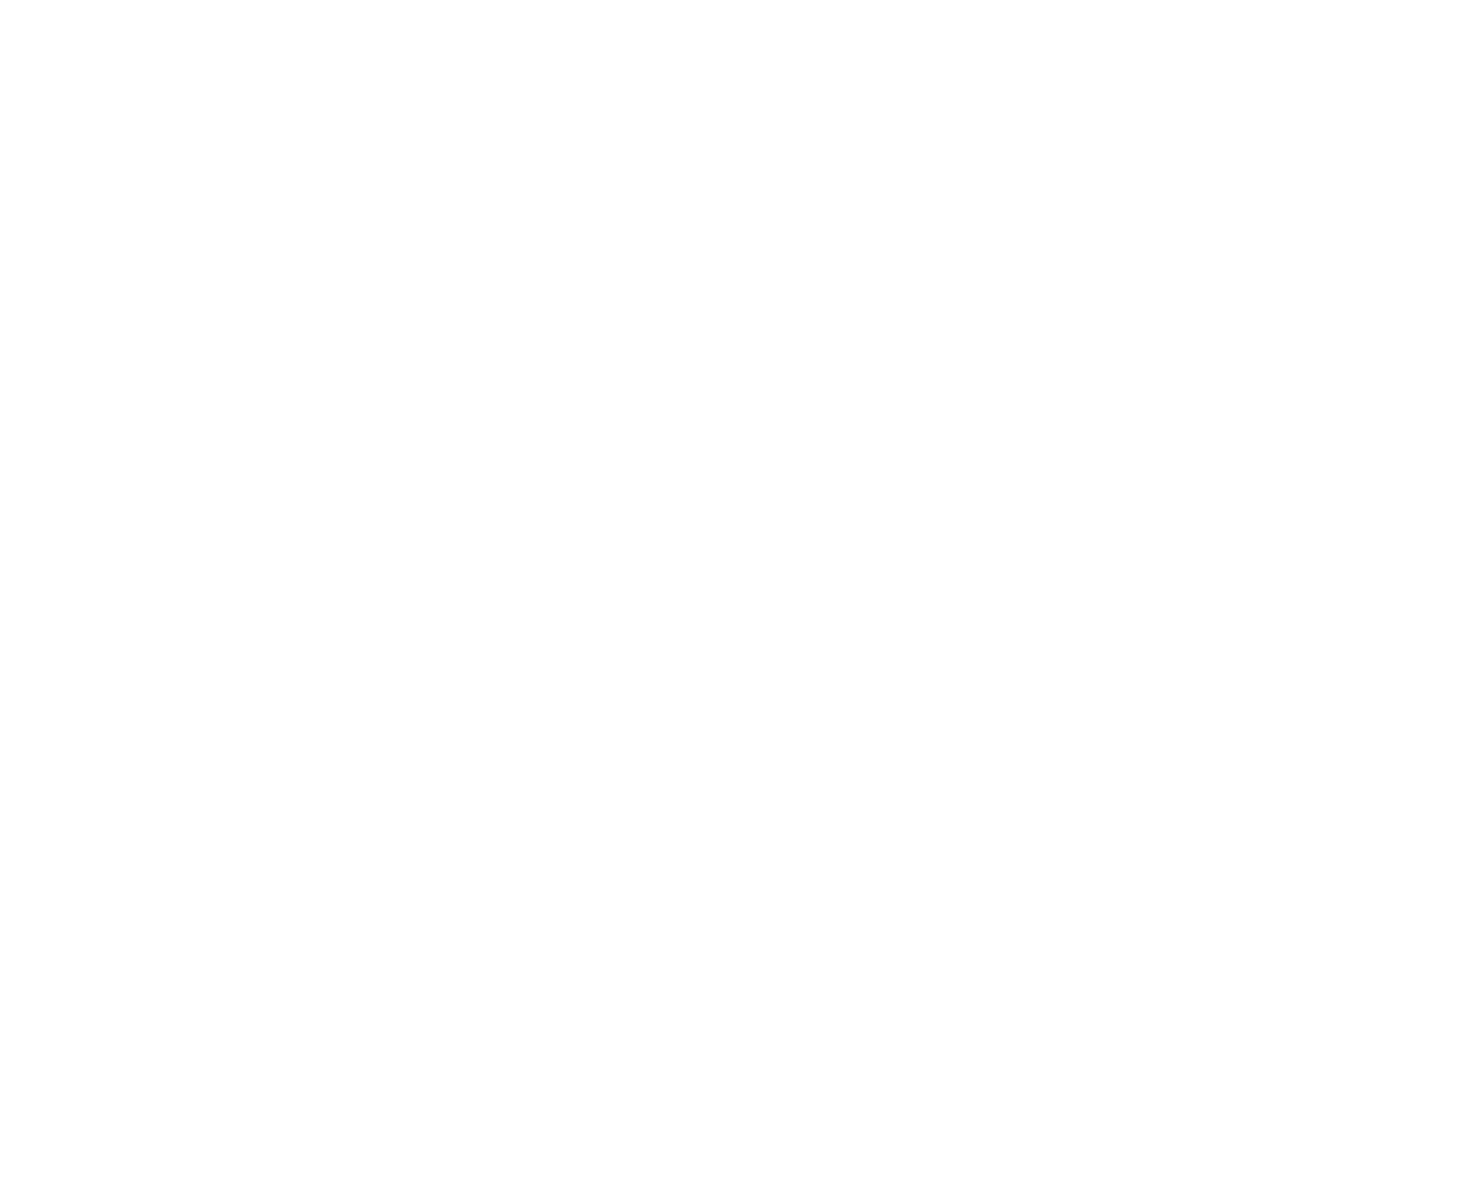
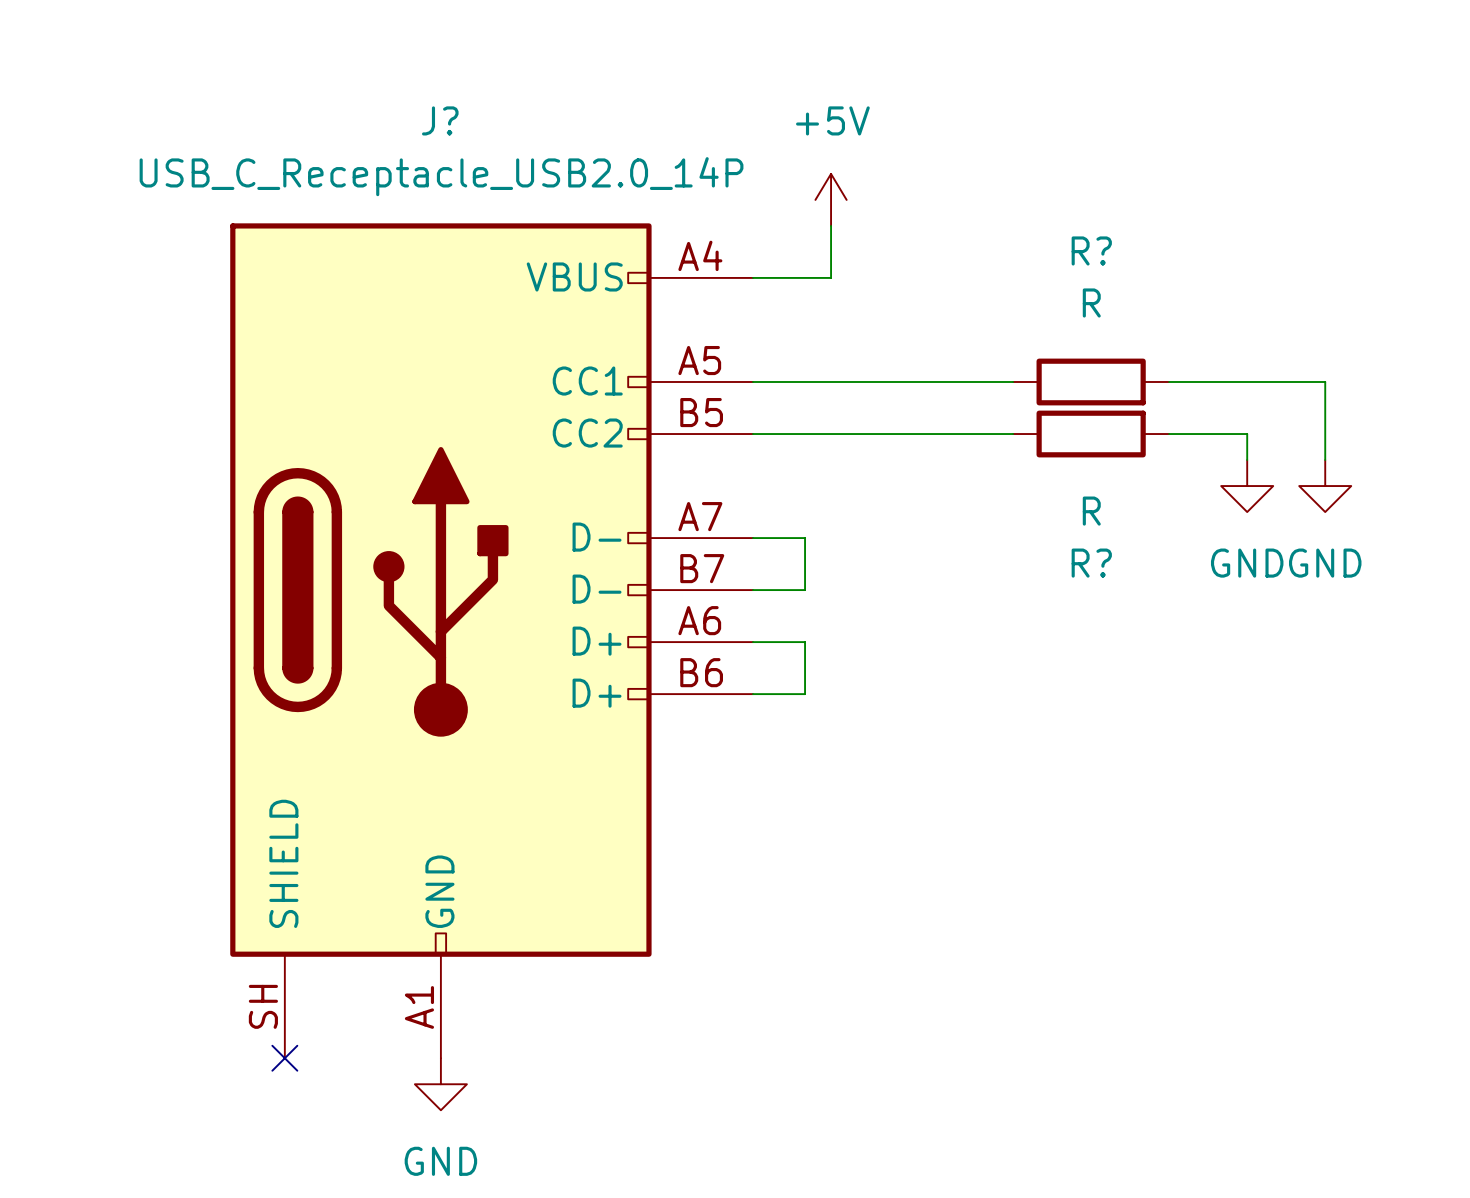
power symbol: none -> +5V (831, 199)
wire: none -> (831, 225) (831, 277) (753, 277)
wire: none -> (753, 381) (1013, 381)
R?: none -> R (1091, 381)
wire: none -> (1169, 381) (1325, 381) (1325, 460)
wire: none -> (753, 434) (1013, 434)
R?: none -> R (1091, 434)
wire: none -> (1169, 434) (1247, 434) (1247, 460)
power symbol: none -> GND (1247, 486)
power symbol: none -> GND (1325, 486)
wire: none -> (753, 538) (805, 538) (805, 590) (753, 590)
J?: none -> USB_C_Receptacle_USB2.0_14P (491, 640)
wire: none -> (753, 642) (805, 642) (805, 694) (753, 694)
no-connect mark: none -> (284, 1058)
power symbol: none -> GND (440, 1084)

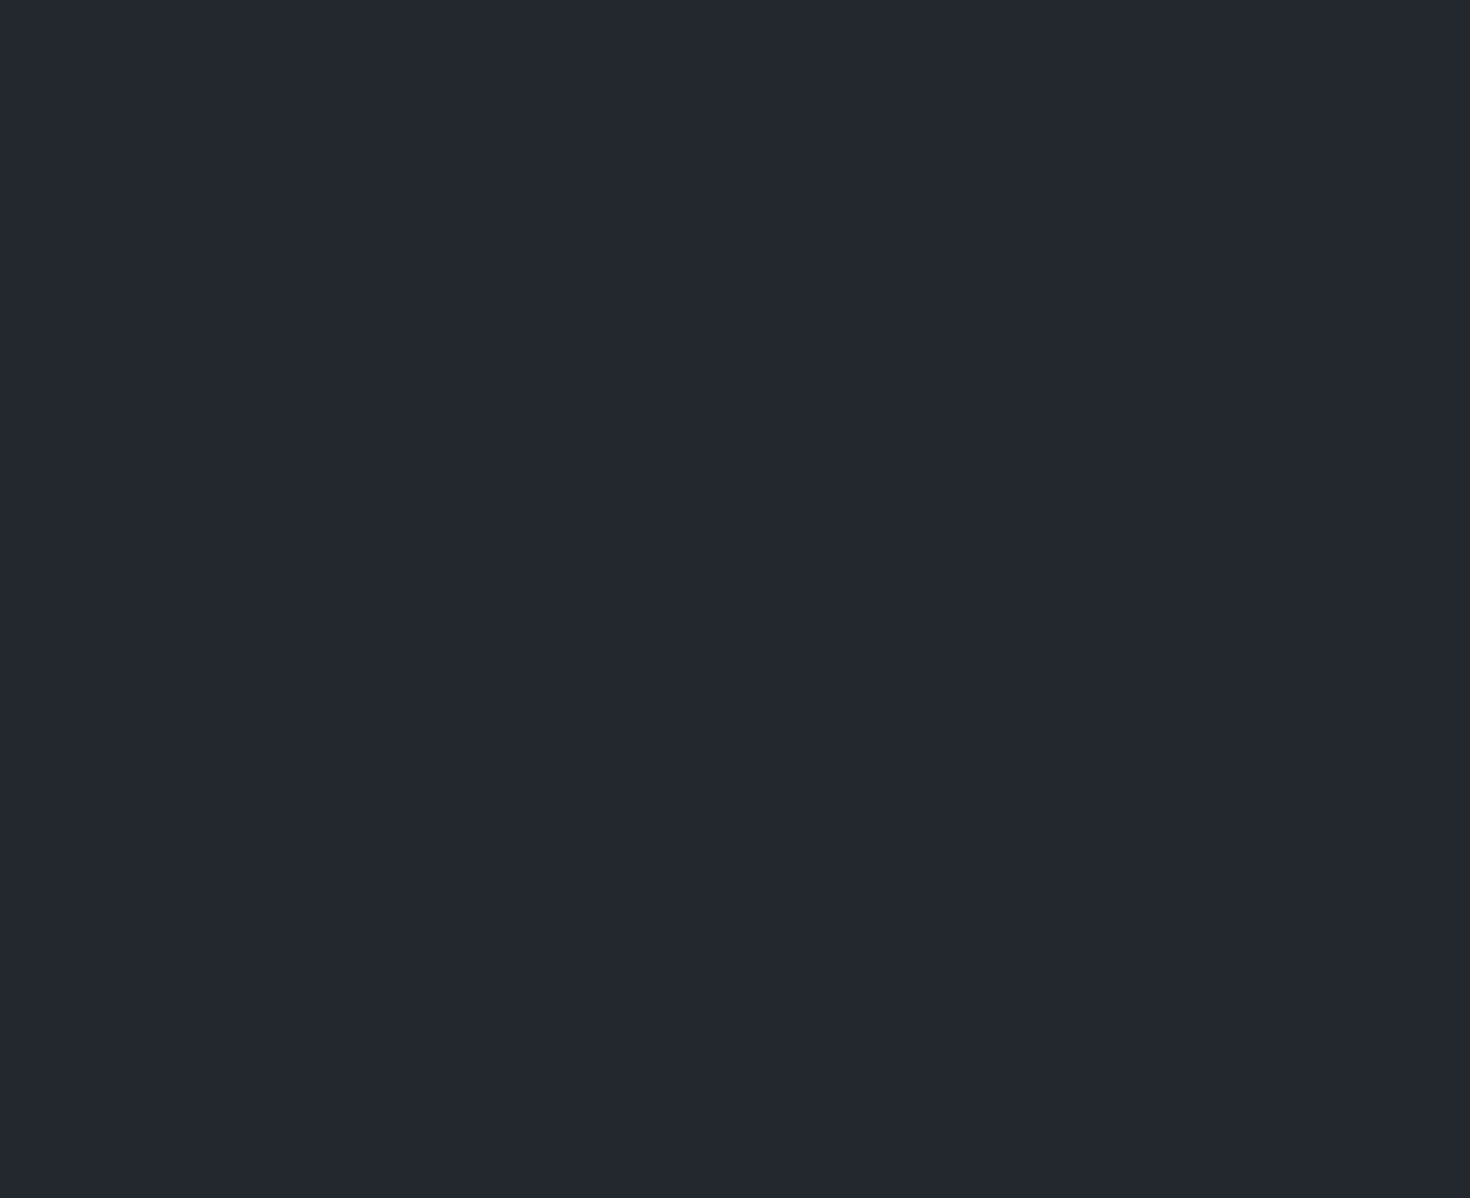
power symbol: +5V (831, 199) -> none
wire: (831, 225) (831, 277) (753, 277) -> none
wire: (753, 381) (1013, 381) -> none
R?: R (1091, 381) -> none
wire: (1169, 381) (1325, 381) (1325, 460) -> none
wire: (753, 434) (1013, 434) -> none
R?: R (1091, 434) -> none
wire: (1169, 434) (1247, 434) (1247, 460) -> none
power symbol: GND (1247, 486) -> none
power symbol: GND (1325, 486) -> none
wire: (753, 538) (805, 538) (805, 590) (753, 590) -> none
J?: USB_C_Receptacle_USB2.0_14P (491, 640) -> none
wire: (753, 642) (805, 642) (805, 694) (753, 694) -> none
no-connect mark: (284, 1058) -> none
power symbol: GND (440, 1084) -> none

